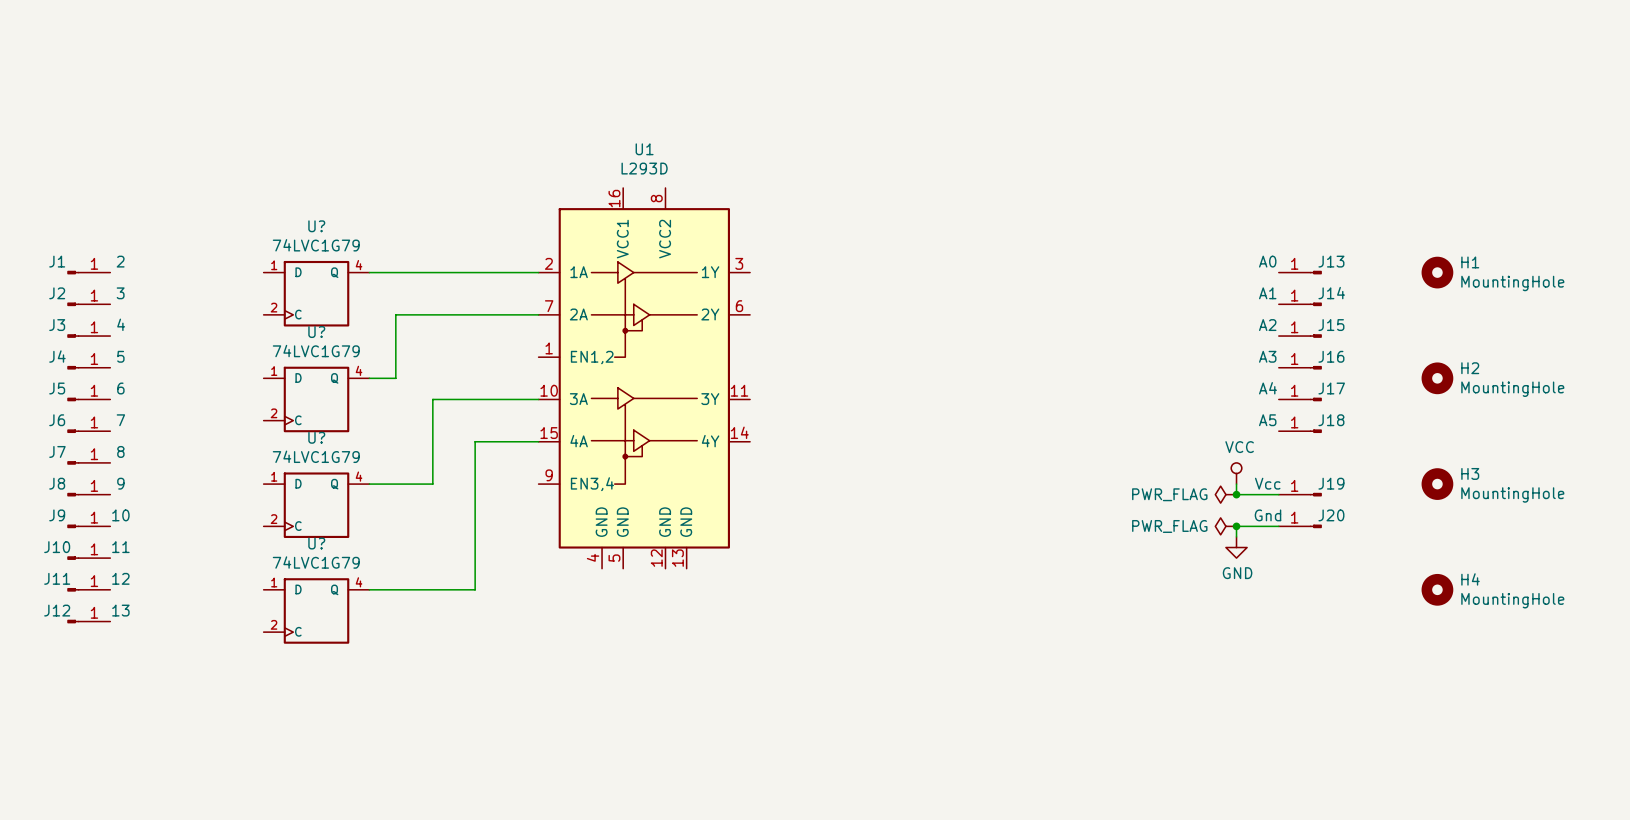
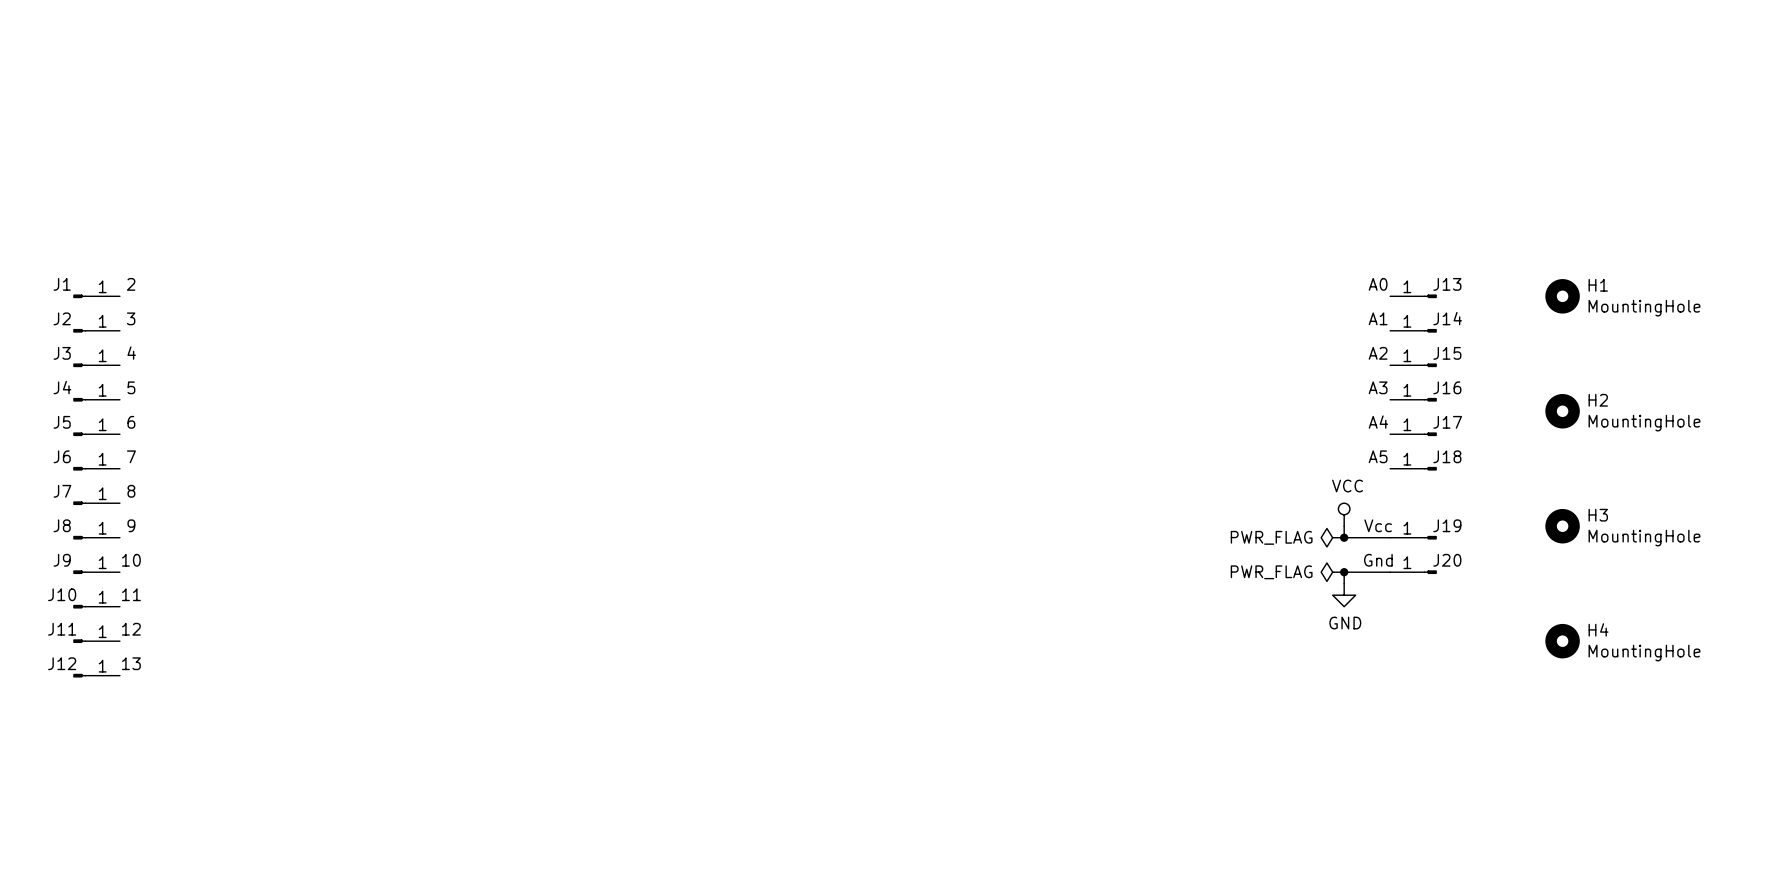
wire: (369, 272) (538, 272) -> none
U?: 74LVC1G79 (316, 293) -> none
wire: (538, 314) (395, 314) (395, 378) (369, 378) -> none
U1: L293D (644, 378) -> none
U?: 74LVC1G79 (316, 399) -> none
wire: (538, 399) (432, 399) (432, 484) (369, 484) -> none
wire: (538, 441) (475, 441) (475, 589) (369, 589) -> none
U?: 74LVC1G79 (316, 505) -> none
U?: 74LVC1G79 (316, 610) -> none

